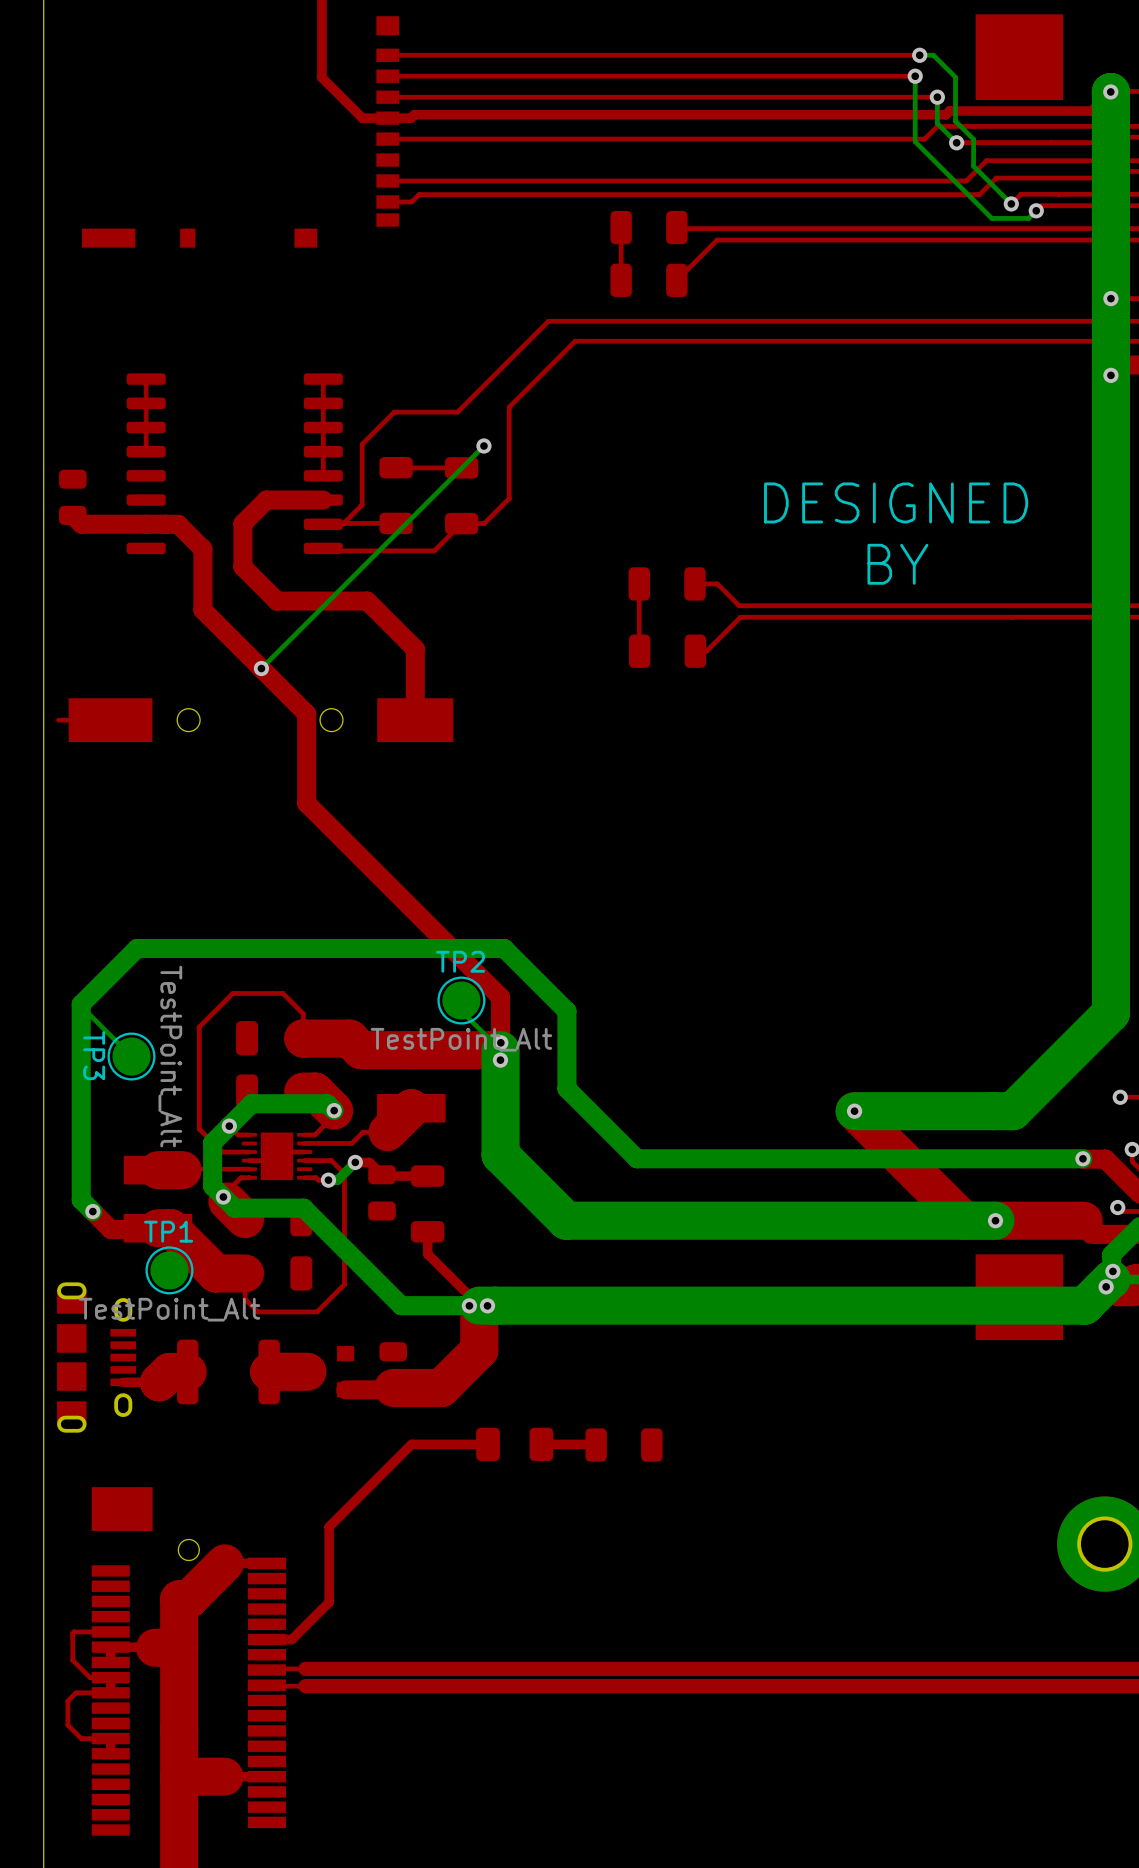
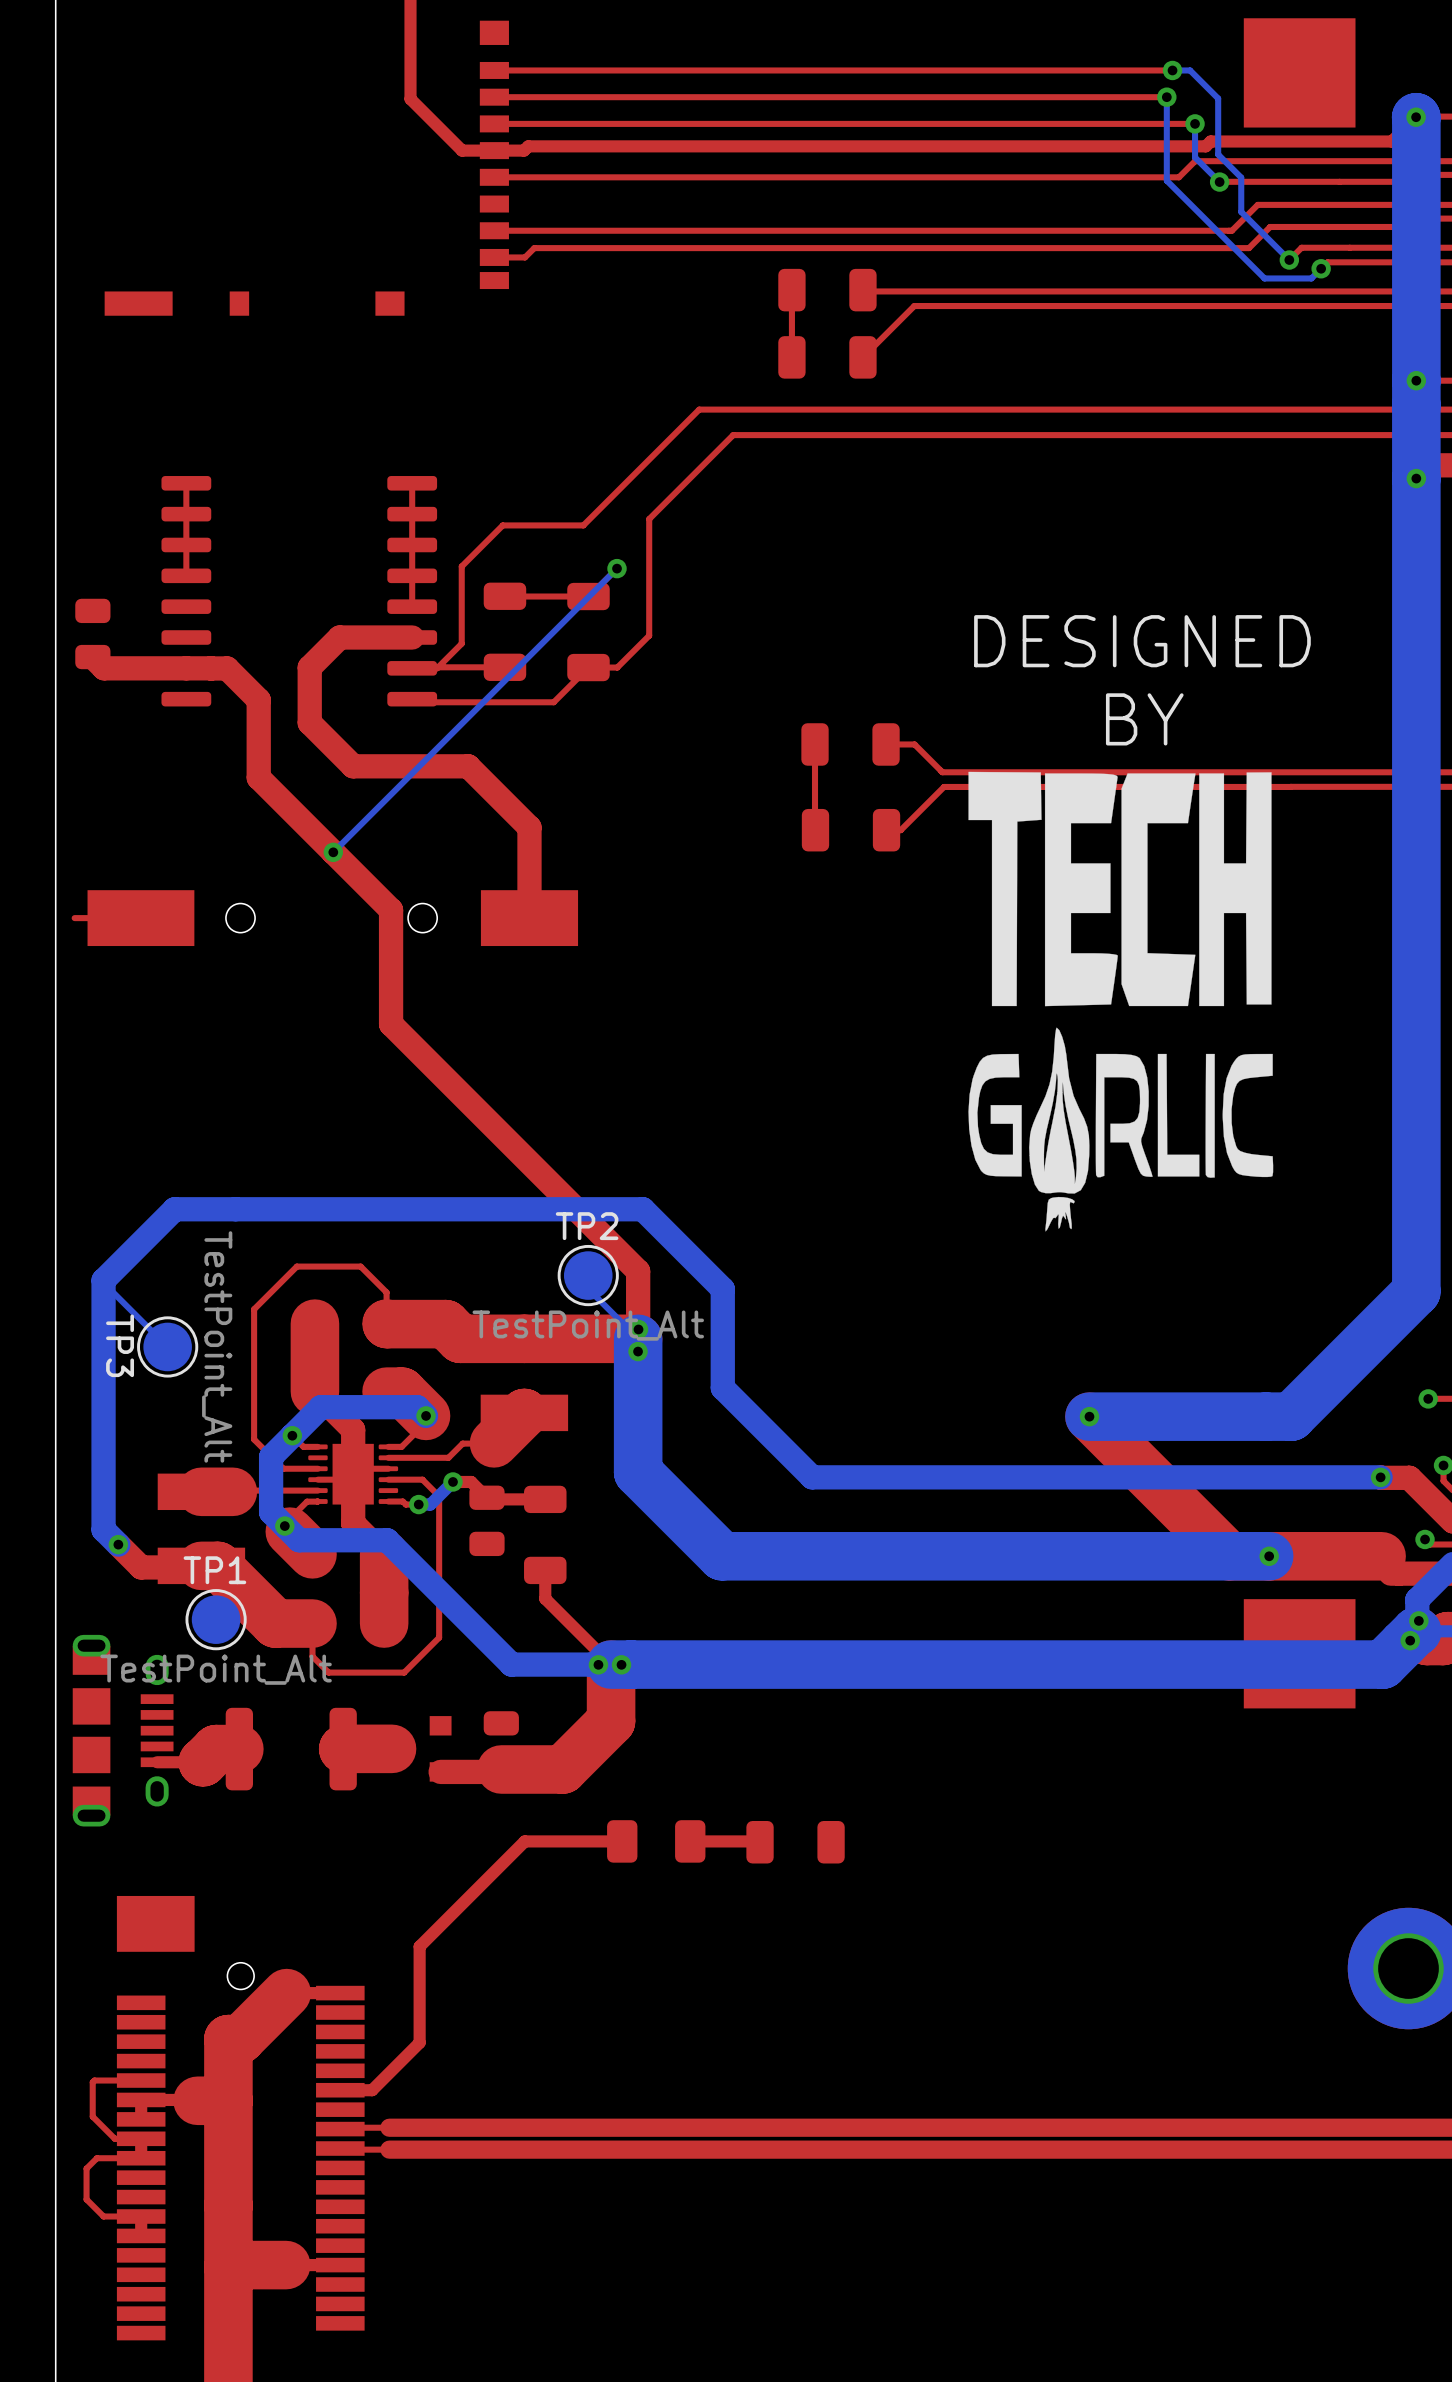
drawing: none -> [968, 771, 1274, 1232]
top track: none -> (314, 1323) (314, 1391) (353, 1429) (353, 1523) (384, 1554) (384, 1623)

